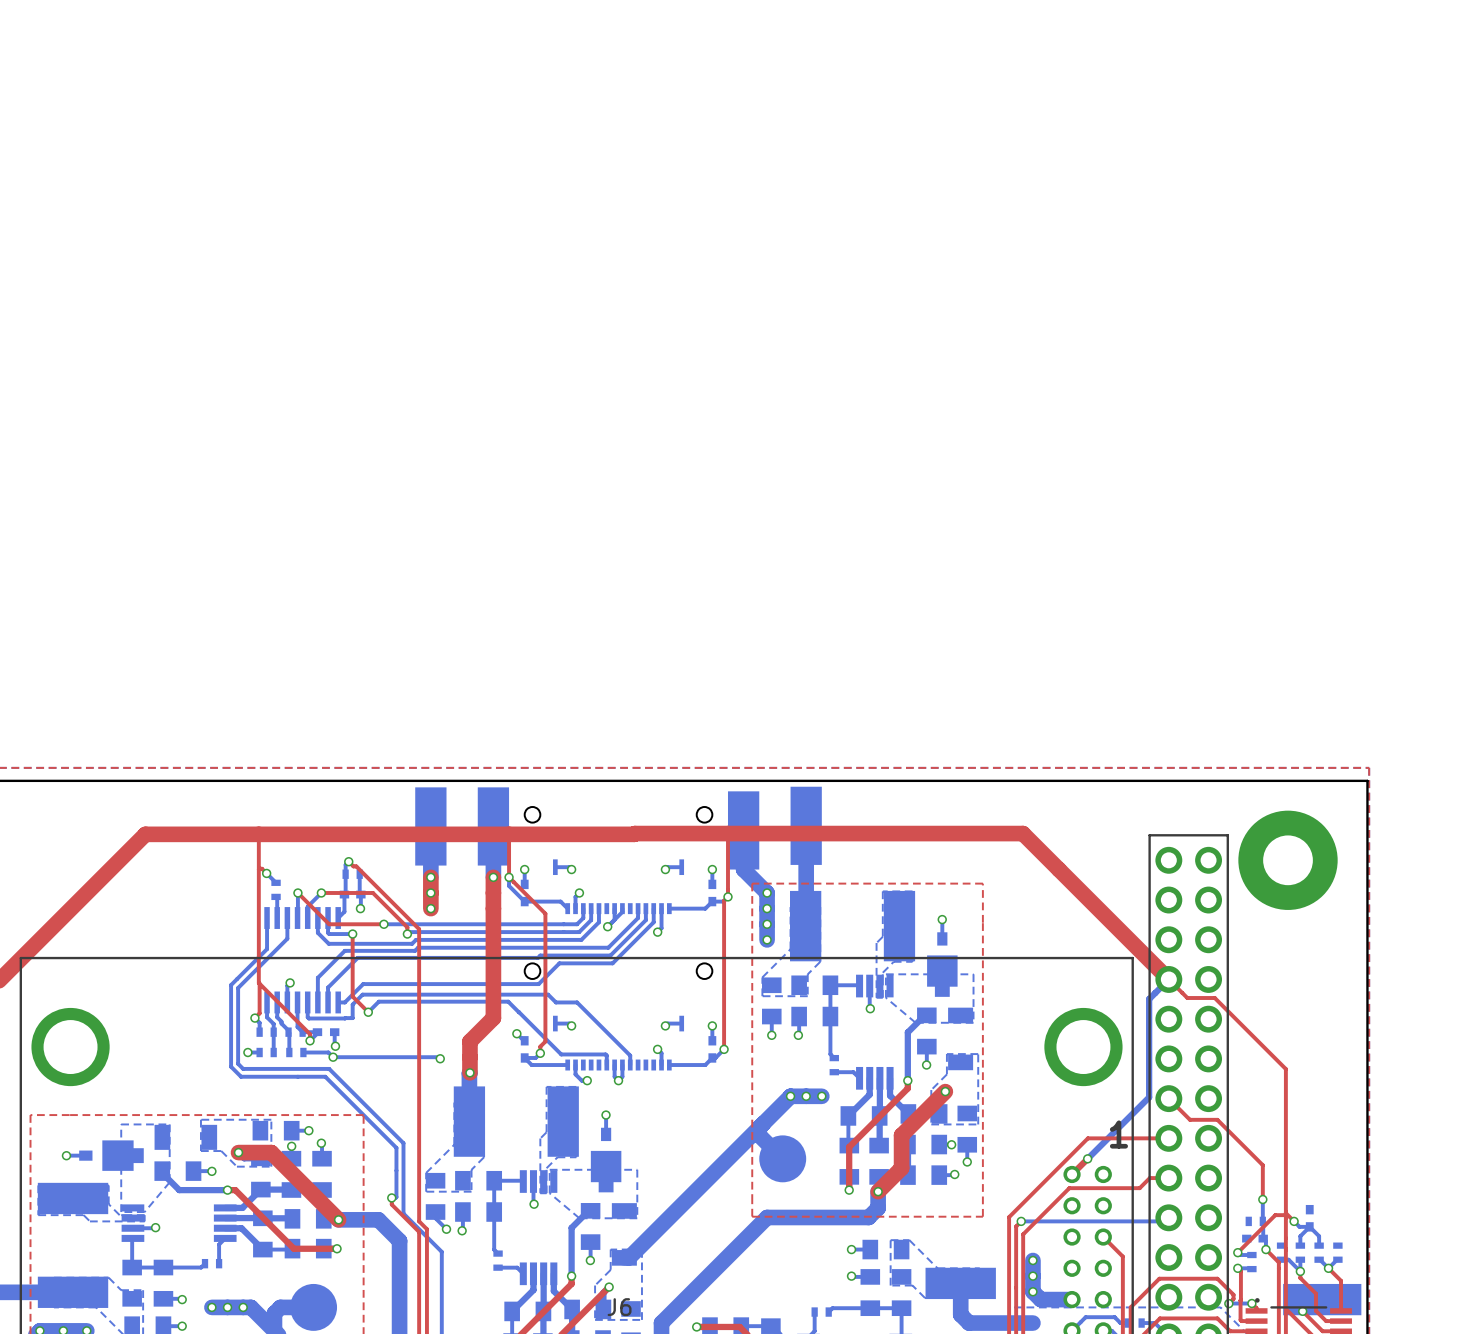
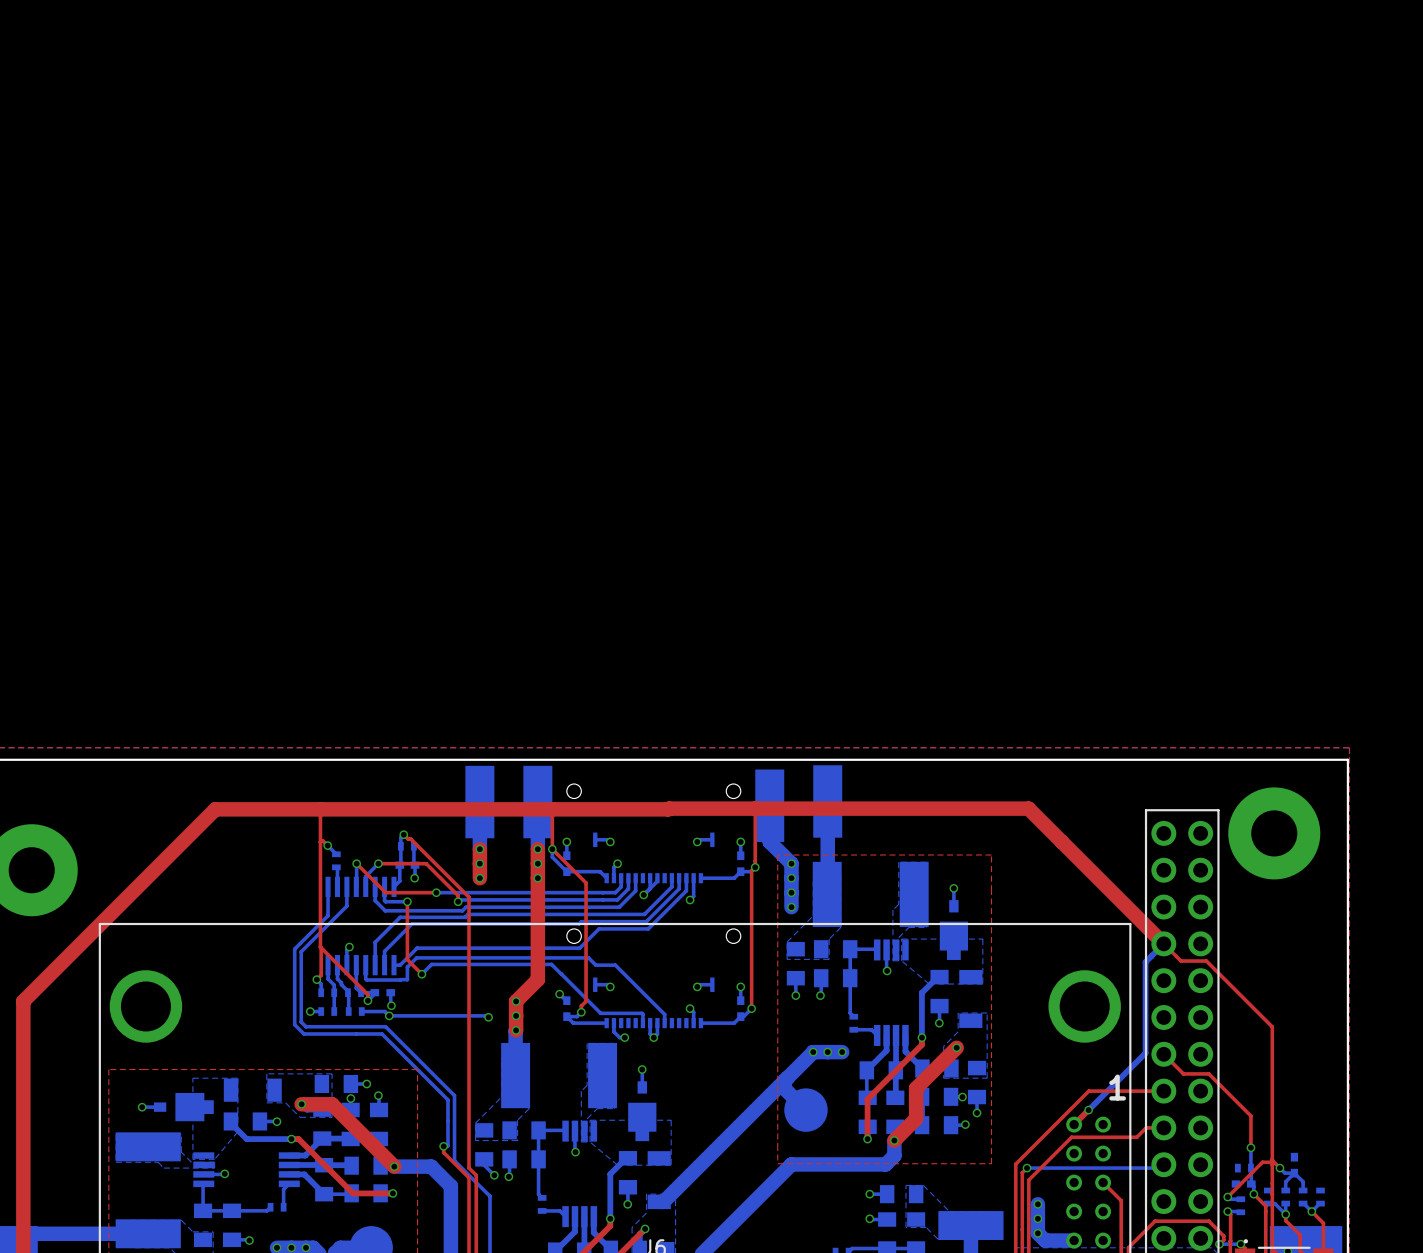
via: none -> (537, 863)
via: none -> (537, 878)
via: none -> (516, 1001)
via: none -> (516, 1015)

